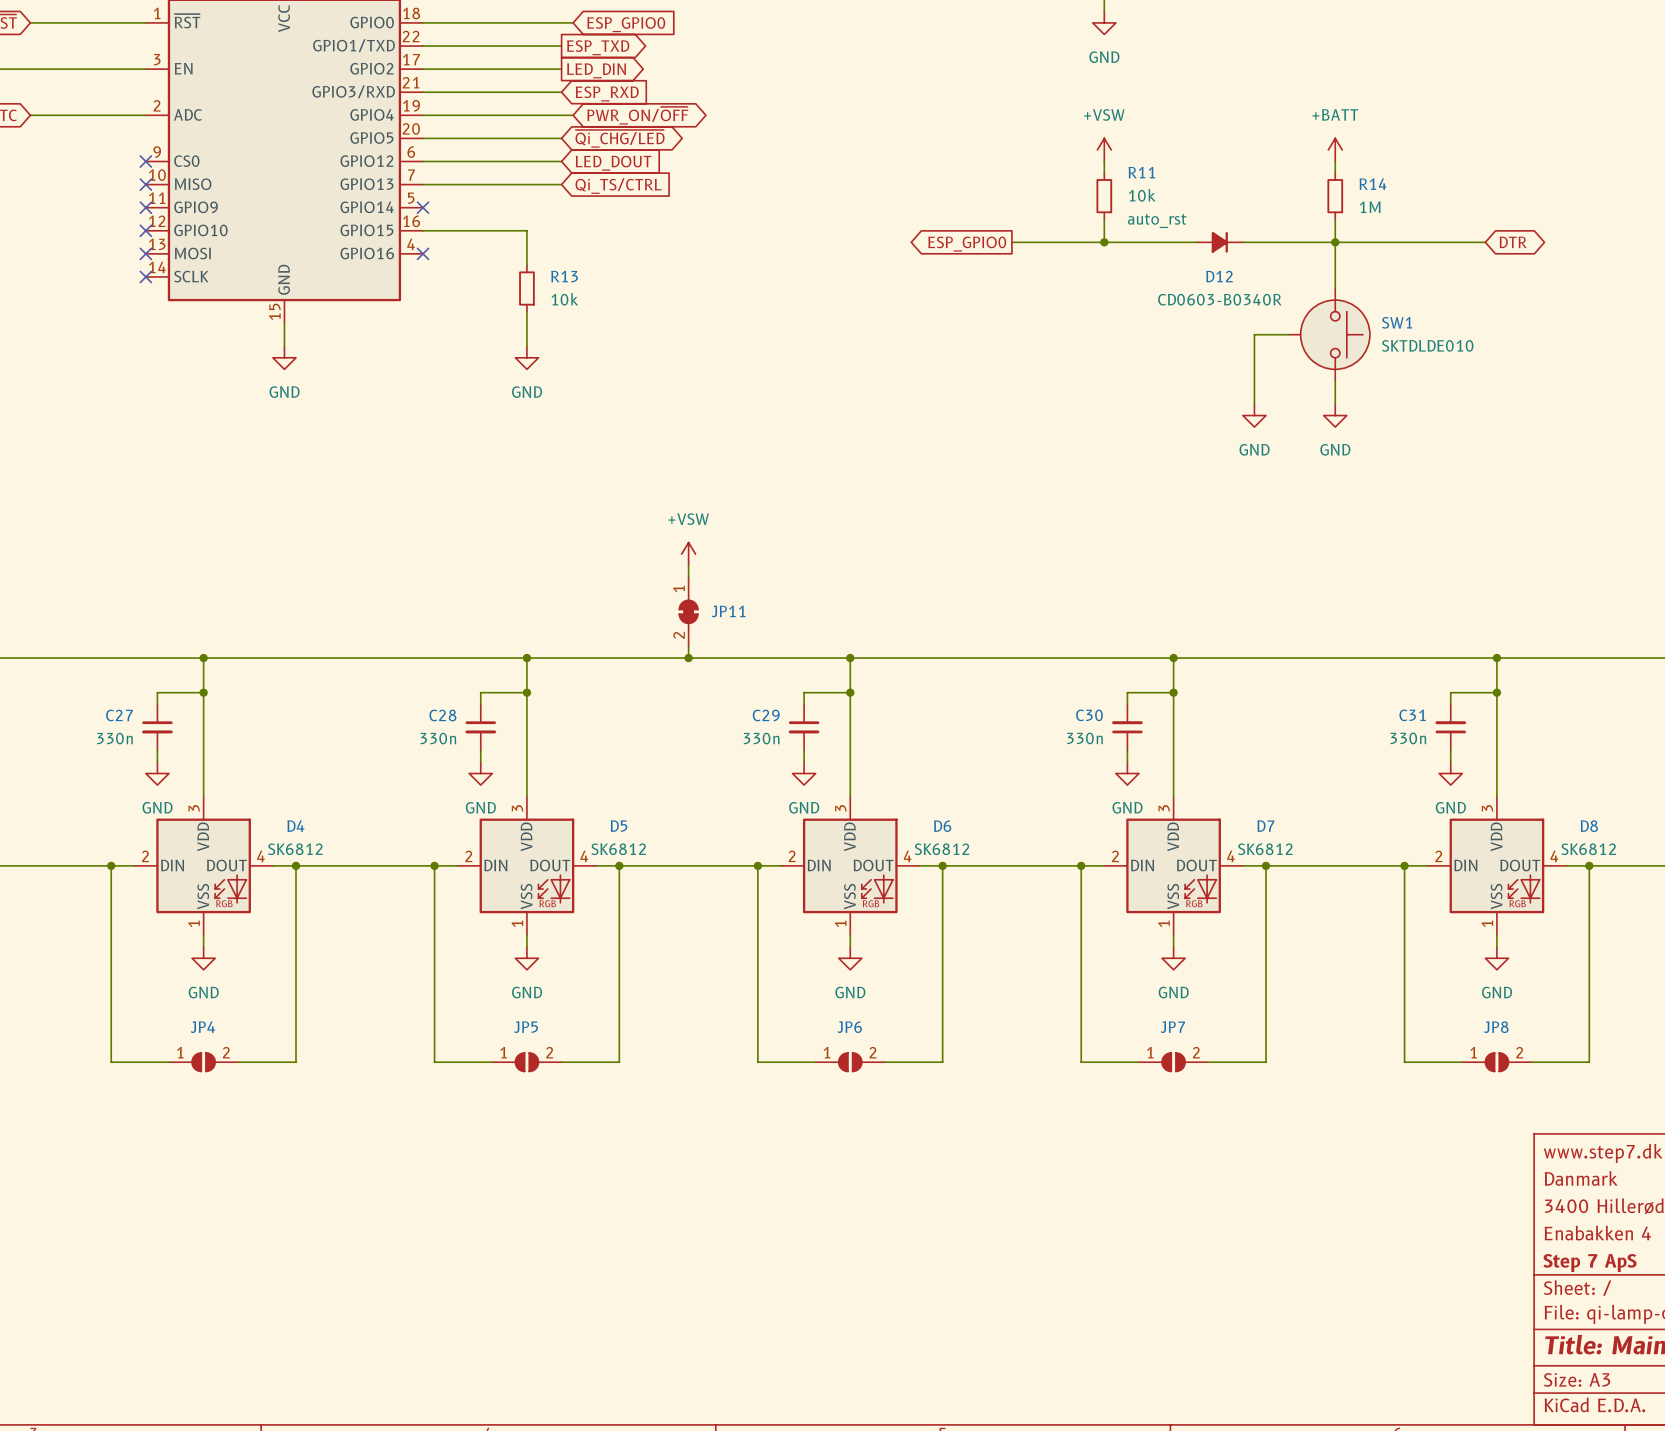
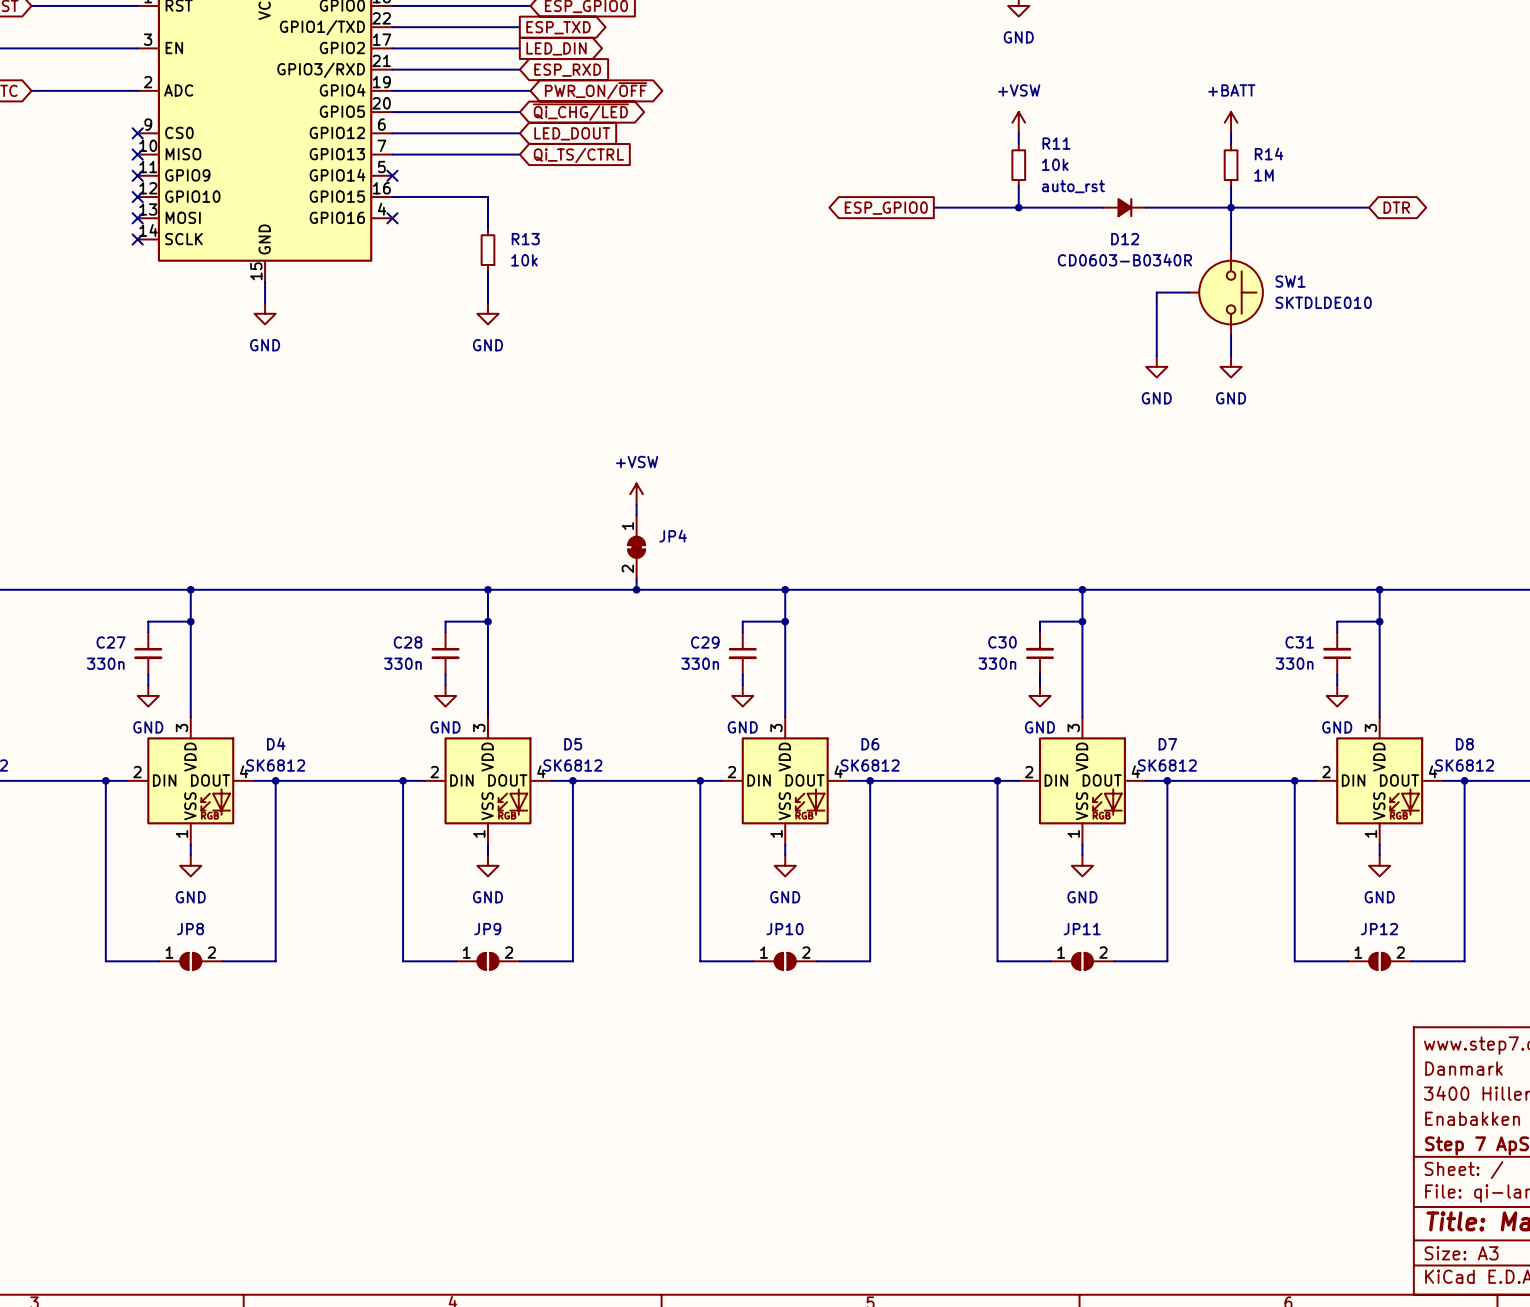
JP11 name: JP11 (728, 611) -> JP4 (673, 536)
JP4 name: JP4 (202, 1027) -> JP8 (190, 929)
JP5 name: JP5 (525, 1027) -> JP9 (487, 929)
JP6 name: JP6 (849, 1027) -> JP10 (784, 929)
JP7 name: JP7 (1172, 1027) -> JP11 (1082, 929)
JP8 name: JP8 (1496, 1027) -> JP12 (1379, 929)

